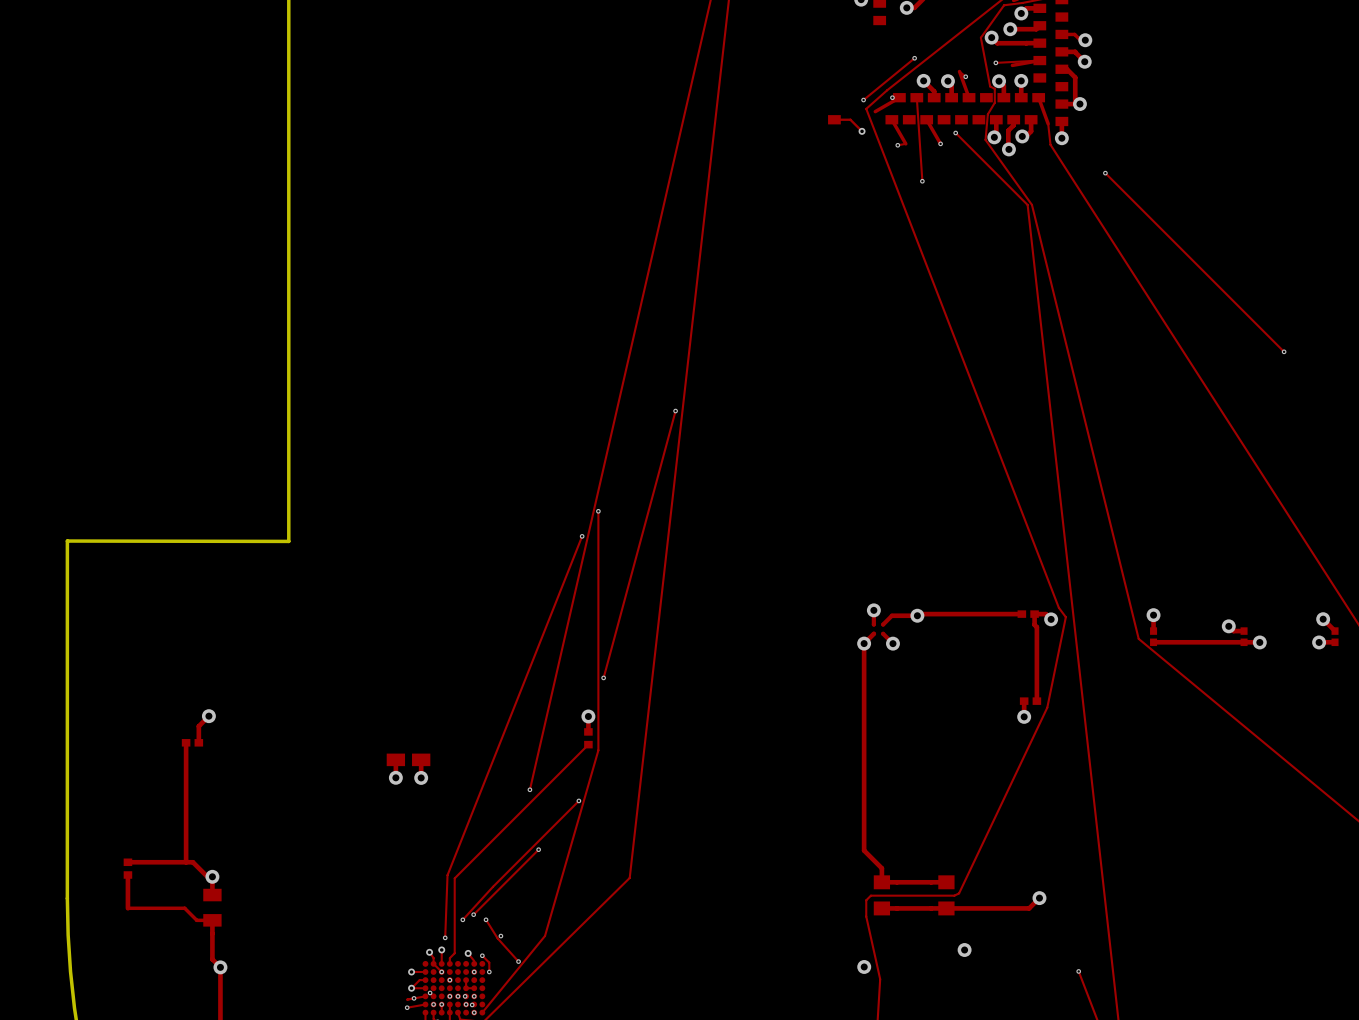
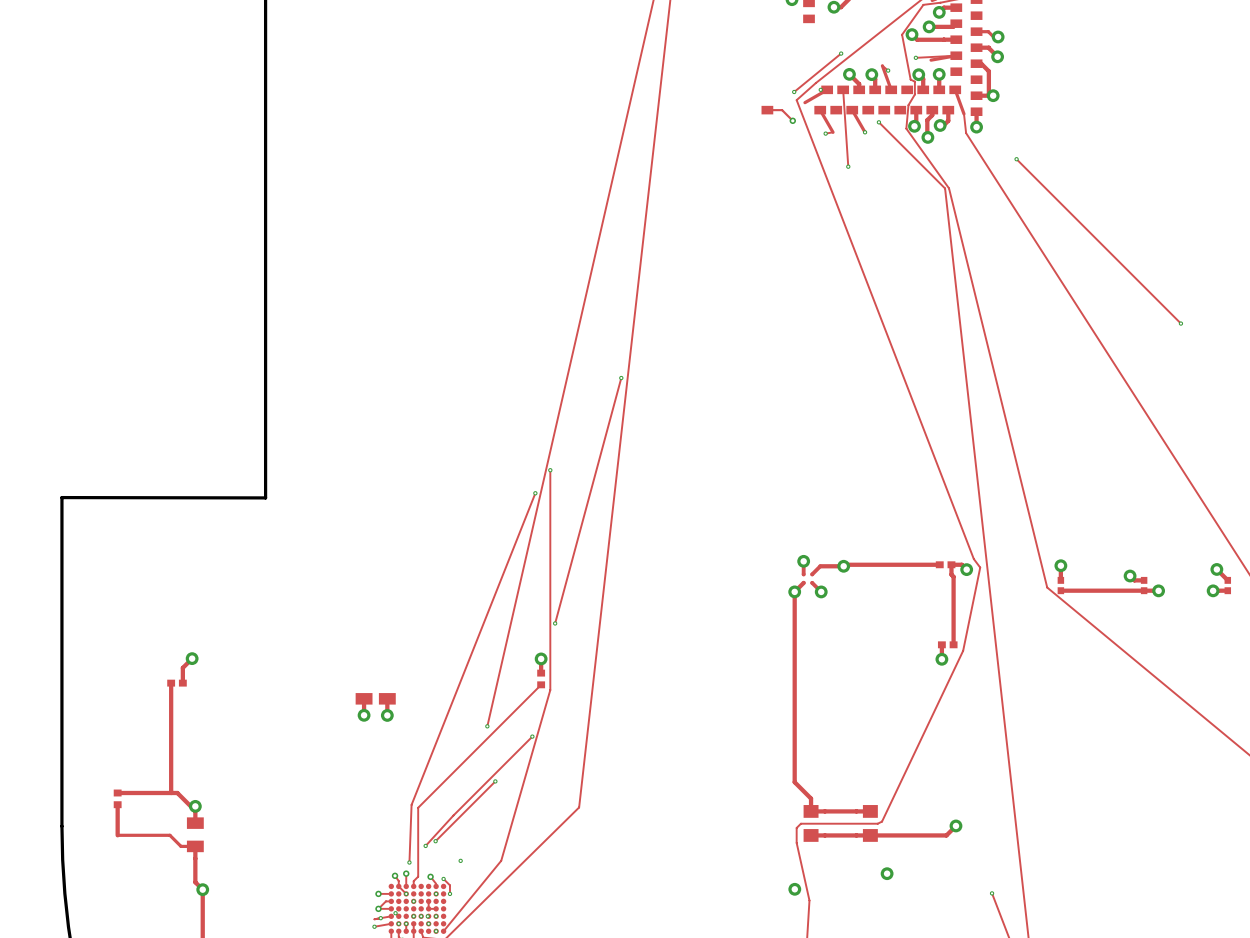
track: (486, 919) (497, 938) (518, 961) -> none
via: (486, 919) -> none
via: (518, 961) -> none
via: (472, 1004) -> none

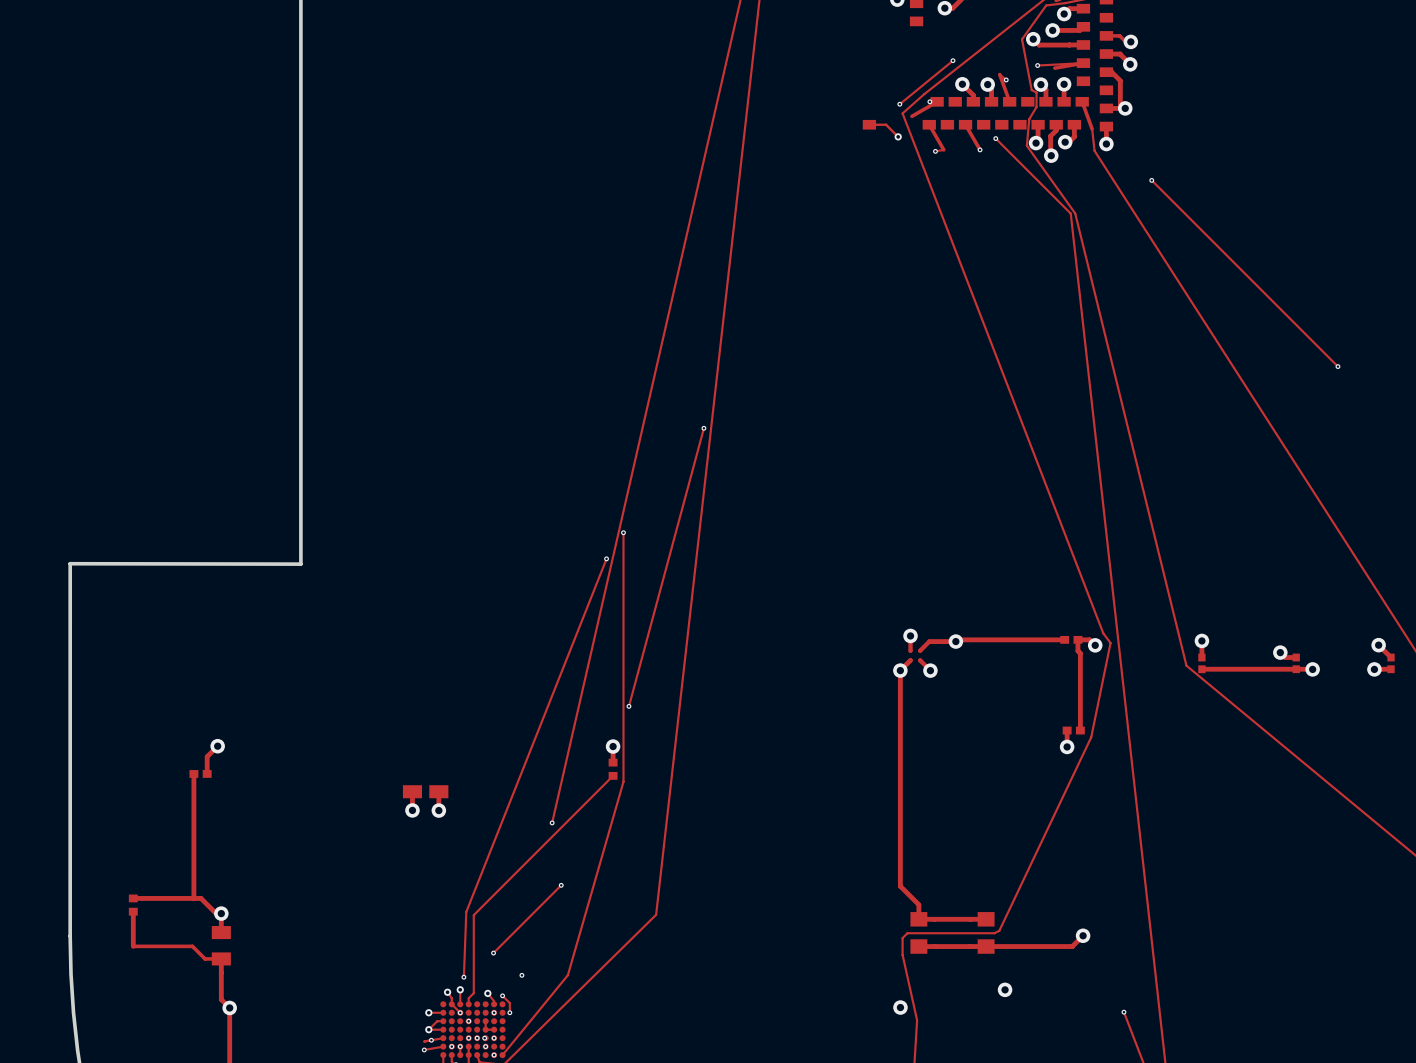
track: (843, 89) (848, 166) -> none
via: (848, 166) -> none
track: (532, 736) (425, 845) -> none
via: (532, 736) -> none
via: (425, 845) -> none
via: (395, 913) -> none

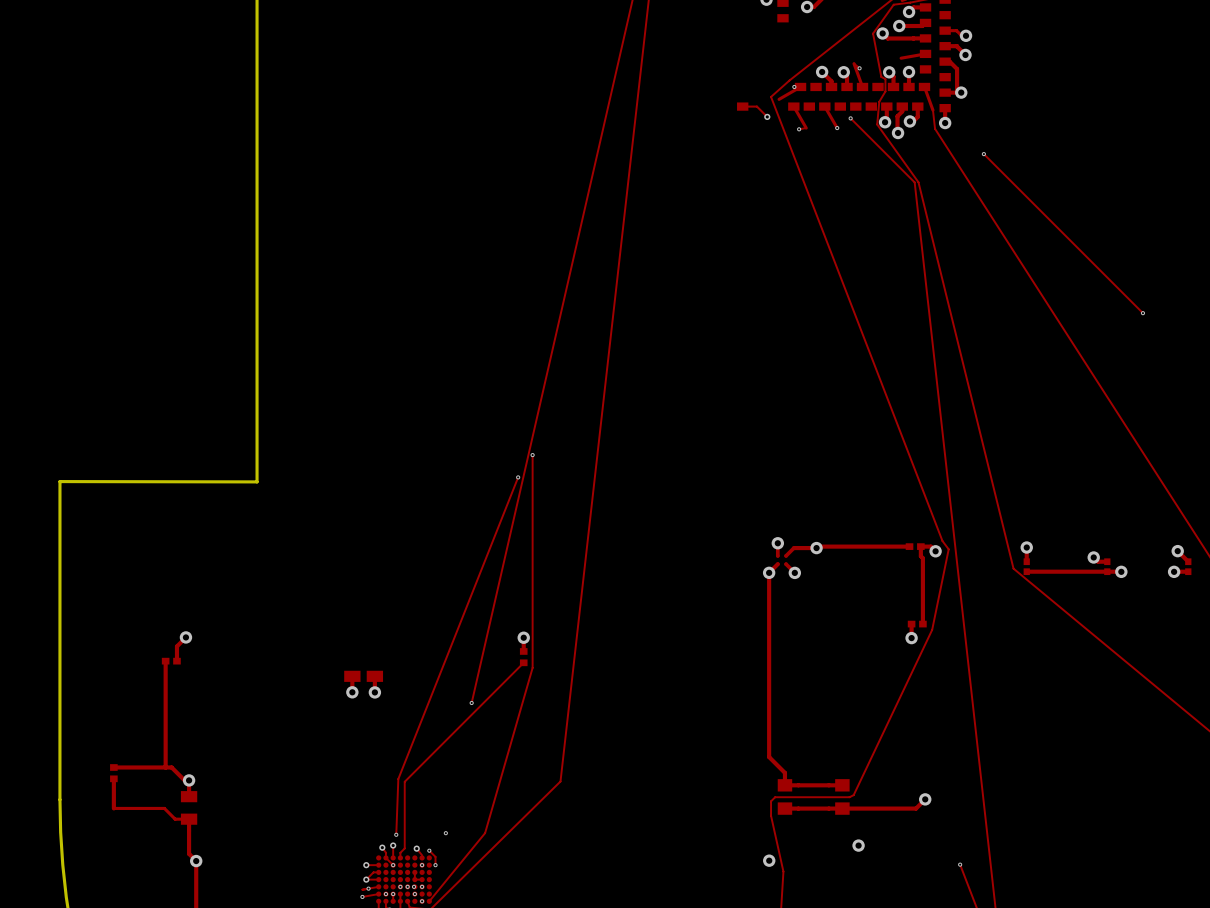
track: (953, 60) (899, 104) -> none
via: (953, 60) -> none
track: (1083, 63) (1037, 65) -> none
via: (1037, 65) -> none
via: (899, 104) -> none
track: (703, 428) (628, 706) -> none
via: (703, 428) -> none
via: (628, 706) -> none
track: (561, 885) (493, 953) -> none
via: (561, 885) -> none
via: (493, 953) -> none
via: (468, 1021) -> none

